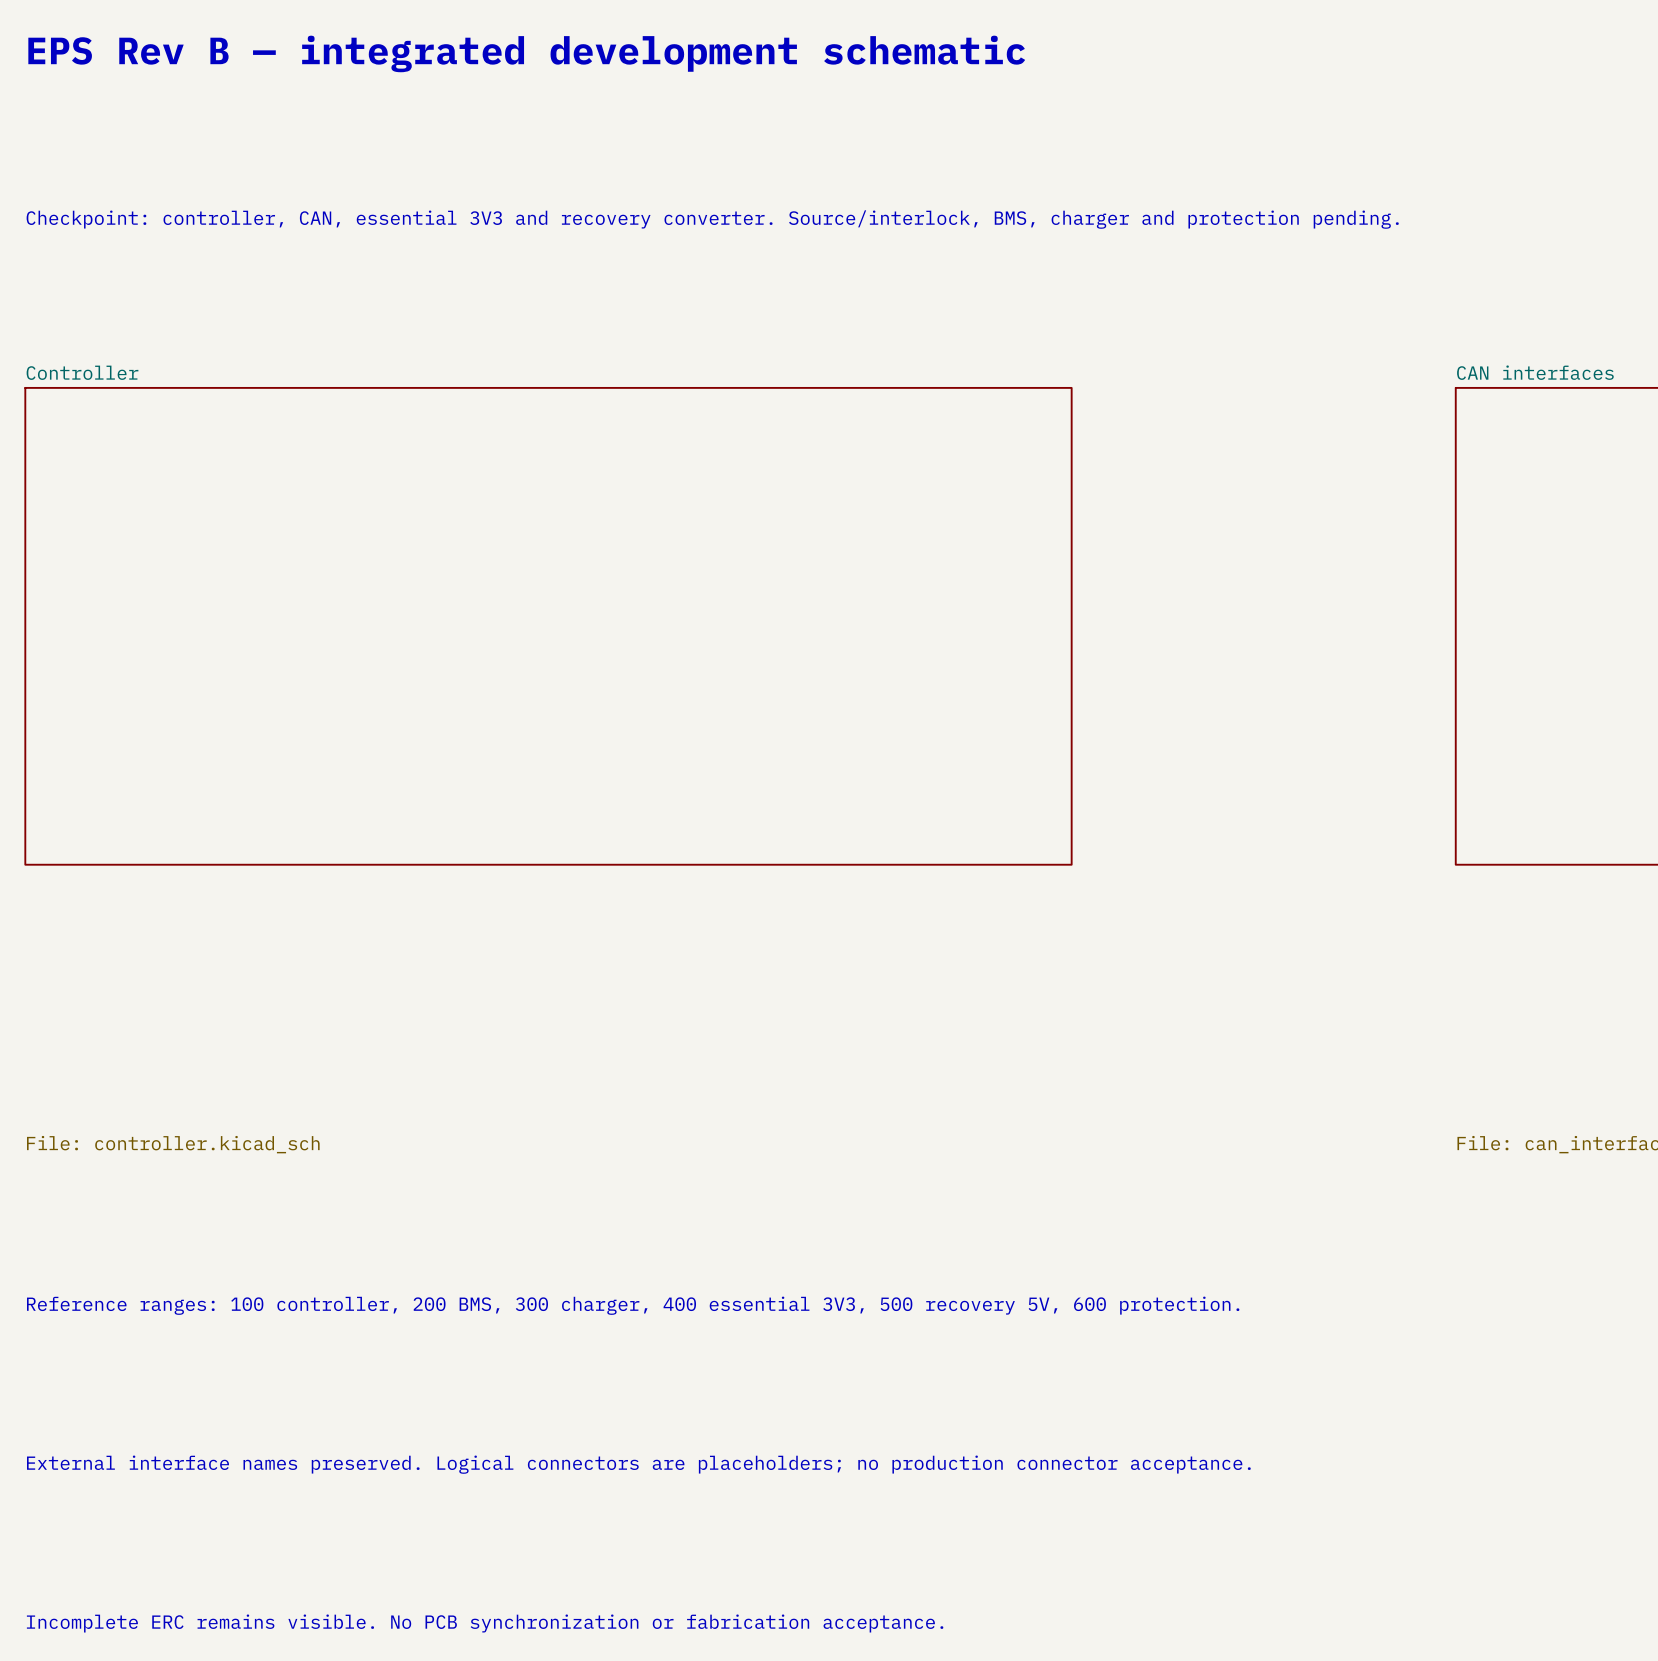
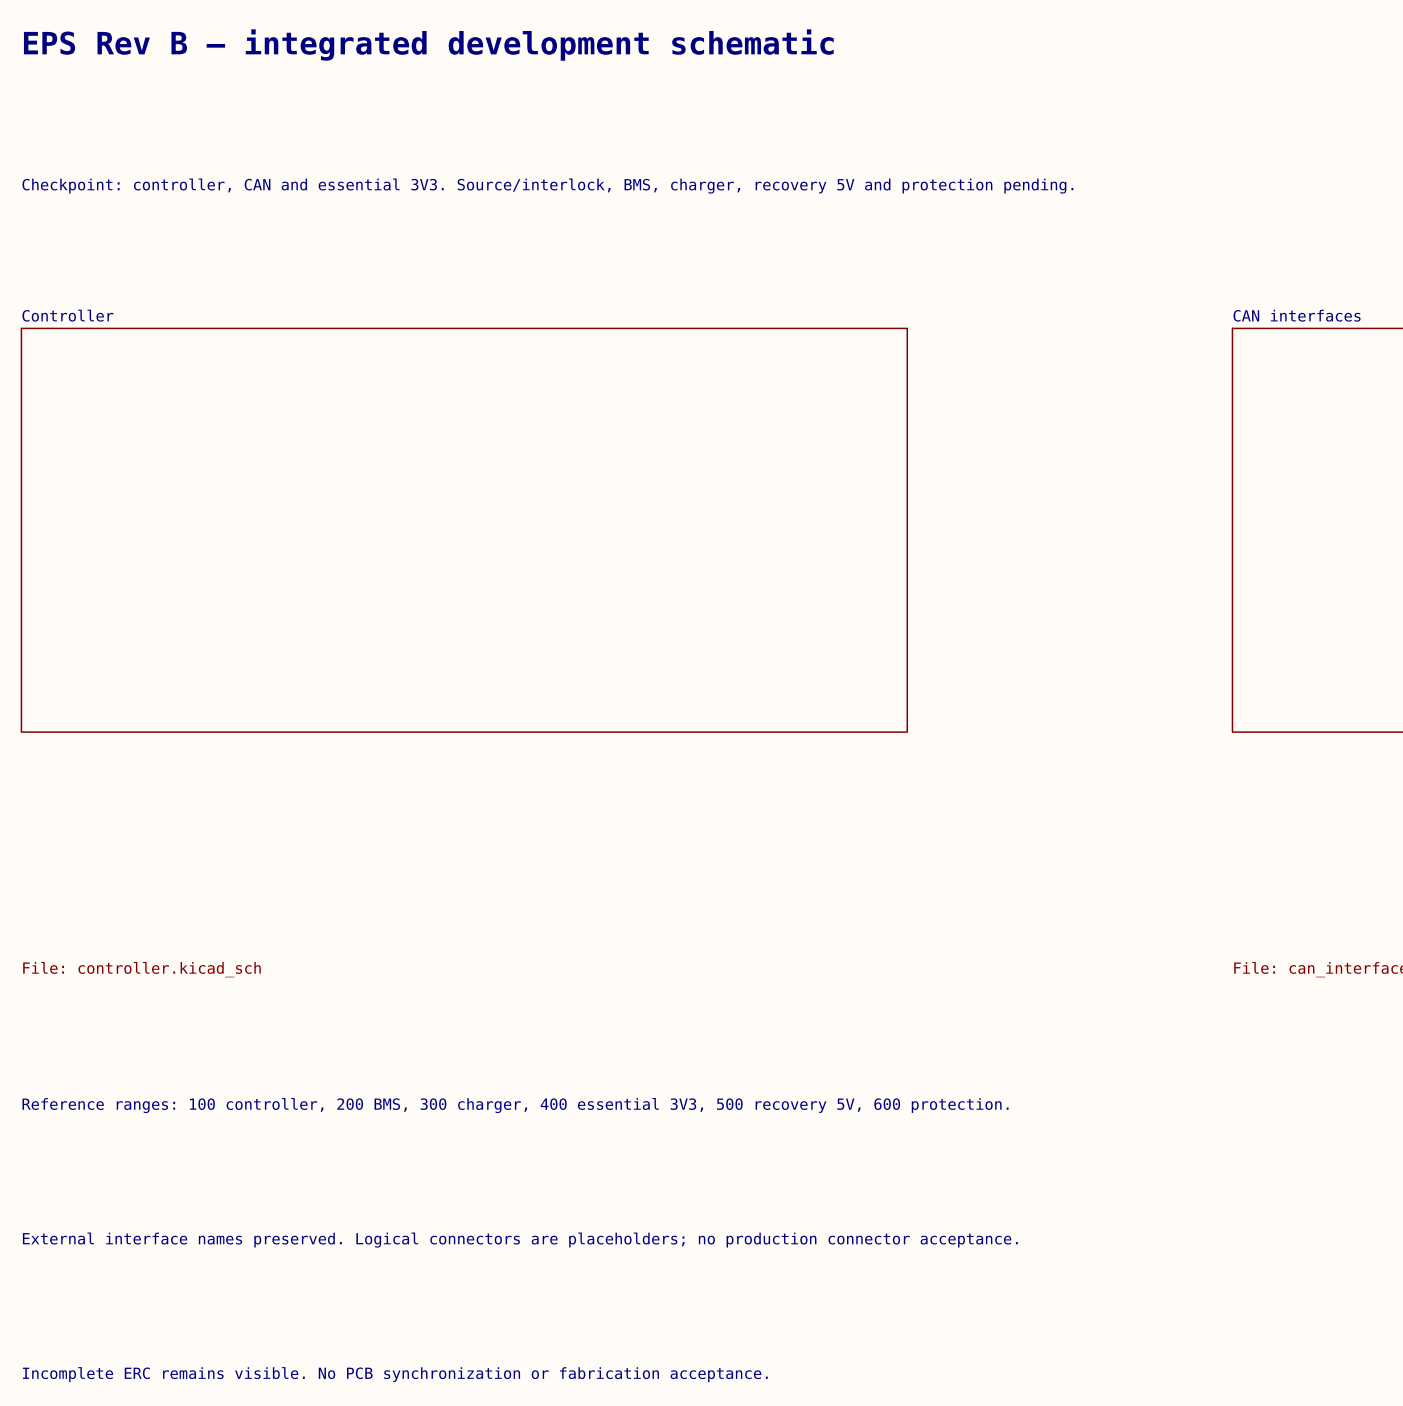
text: Checkpoint: controller, CAN, essential 3V3 and recovery converter. Source/interlock, BMS, charger and protection pending. (712, 219) -> Checkpoint: controller, CAN and essential 3V3. Source/interlock, BMS, charger, recovery 5V and protection pending. (547, 186)

